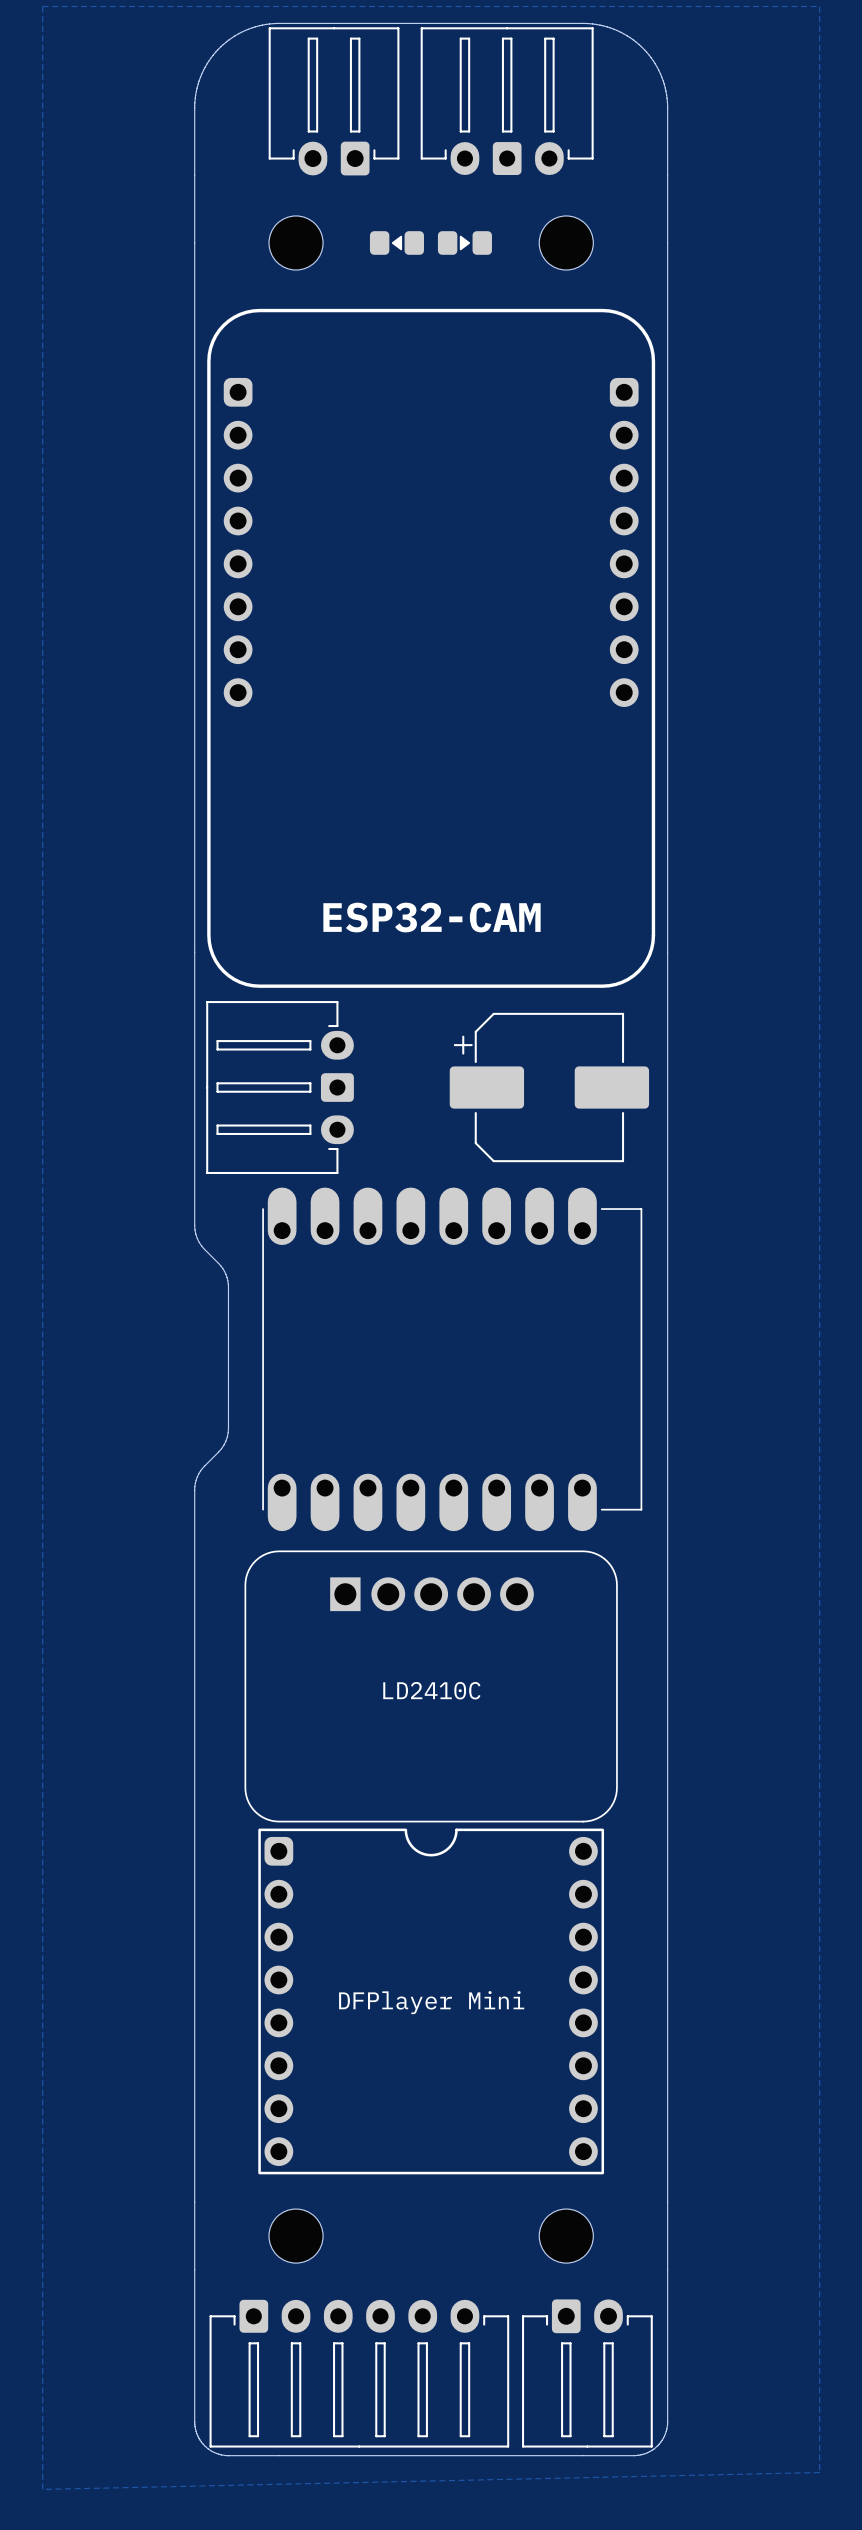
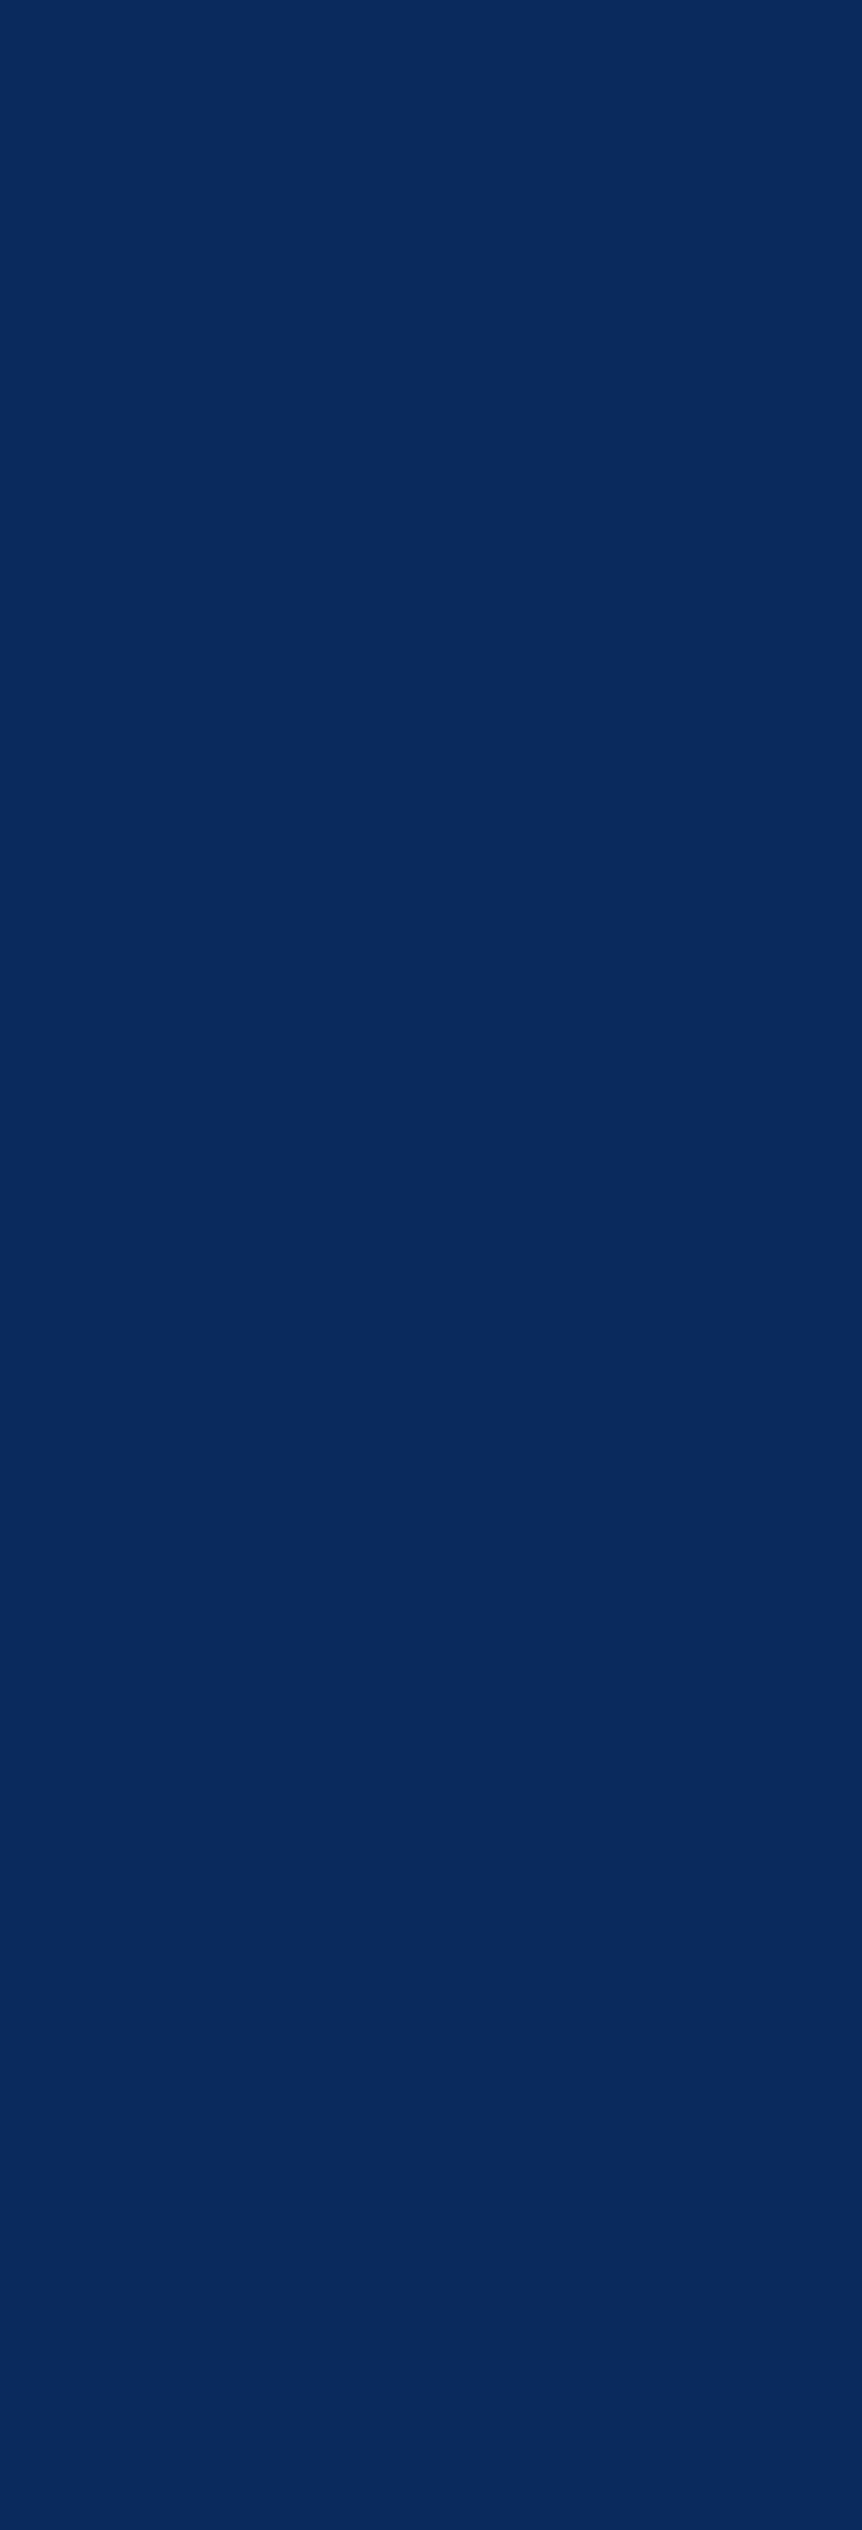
zone outline: (42, 6) (819, 6) (819, 2472) (42, 2489) (42, 6) -> none
part: (334, 101) -> none
part: (507, 101) -> none
part: (296, 242) -> none
part: (396, 242) -> none
part: (464, 242) -> none
part: (566, 242) -> none
part: (431, 648) -> none
part: (280, 1087) -> none
part: (549, 1087) -> none
part: (452, 1359) -> none
part: (431, 1686) -> none
part: (431, 2001) -> none
part: (296, 2236) -> none
part: (566, 2236) -> none
part: (359, 2373) -> none
part: (587, 2373) -> none
board edge: (194, 2421) (194, 1489) (198, 1474) (223, 1445) (228, 1428) (227, 1280) (220, 1265) (199, 1242) (194, 1225) (195, 95) (203, 70) (217, 49) (238, 33) (262, 25) (279, 23) (588, 23) (616, 30) (633, 39) (644, 49) (660, 74) (665, 88) (667, 105) (667, 2422) (664, 2435) (657, 2445) (647, 2452) (638, 2455) -> none
board edge: (194, 2422) (195, 2426) -> none
board edge: (195, 2426) (197, 2435) (204, 2445) (212, 2451) (226, 2455) (633, 2455) -> none
board edge: (638, 2455) (634, 2455) -> none

